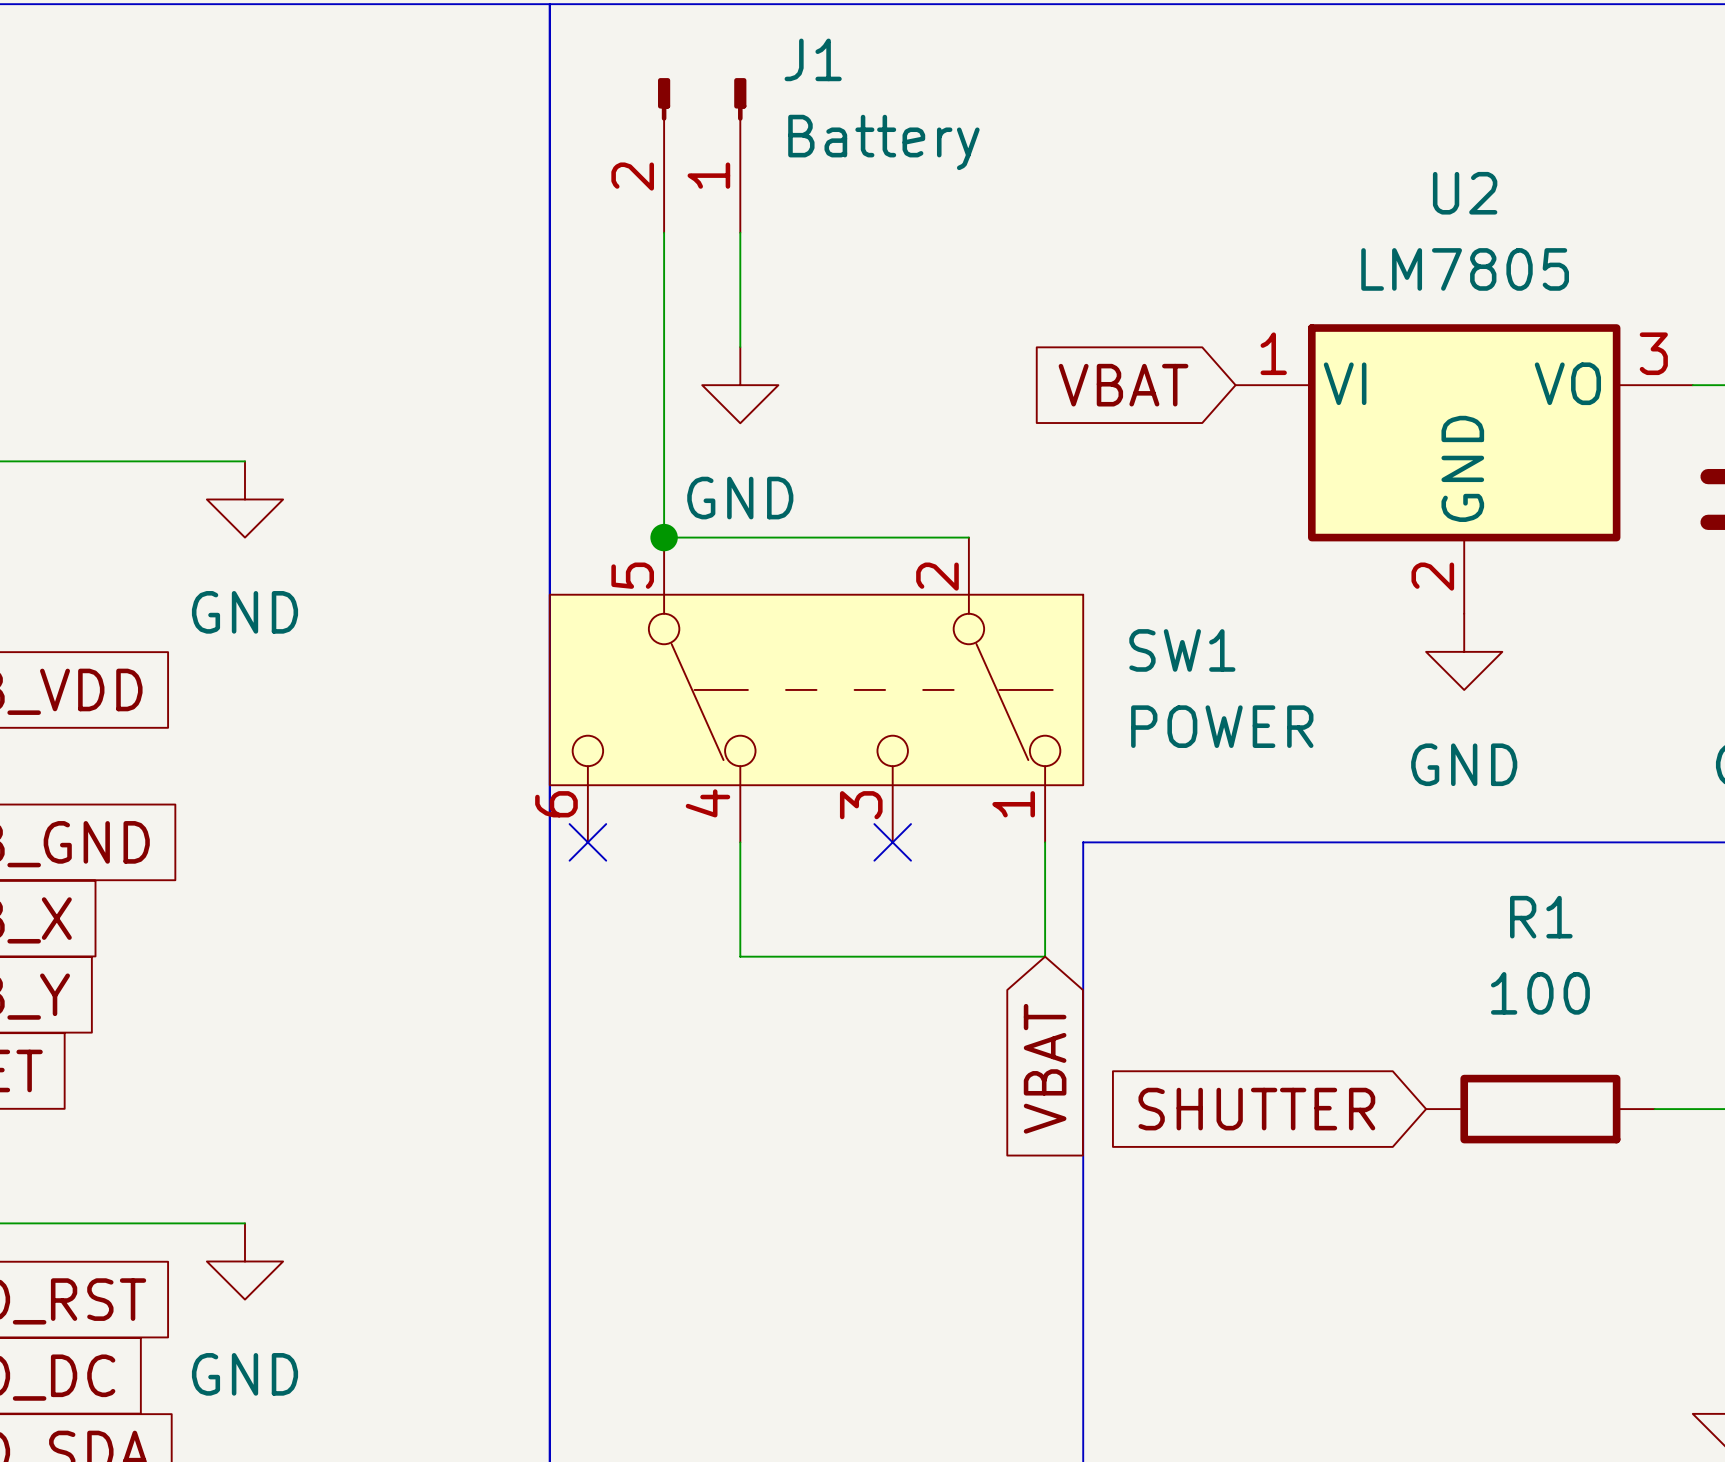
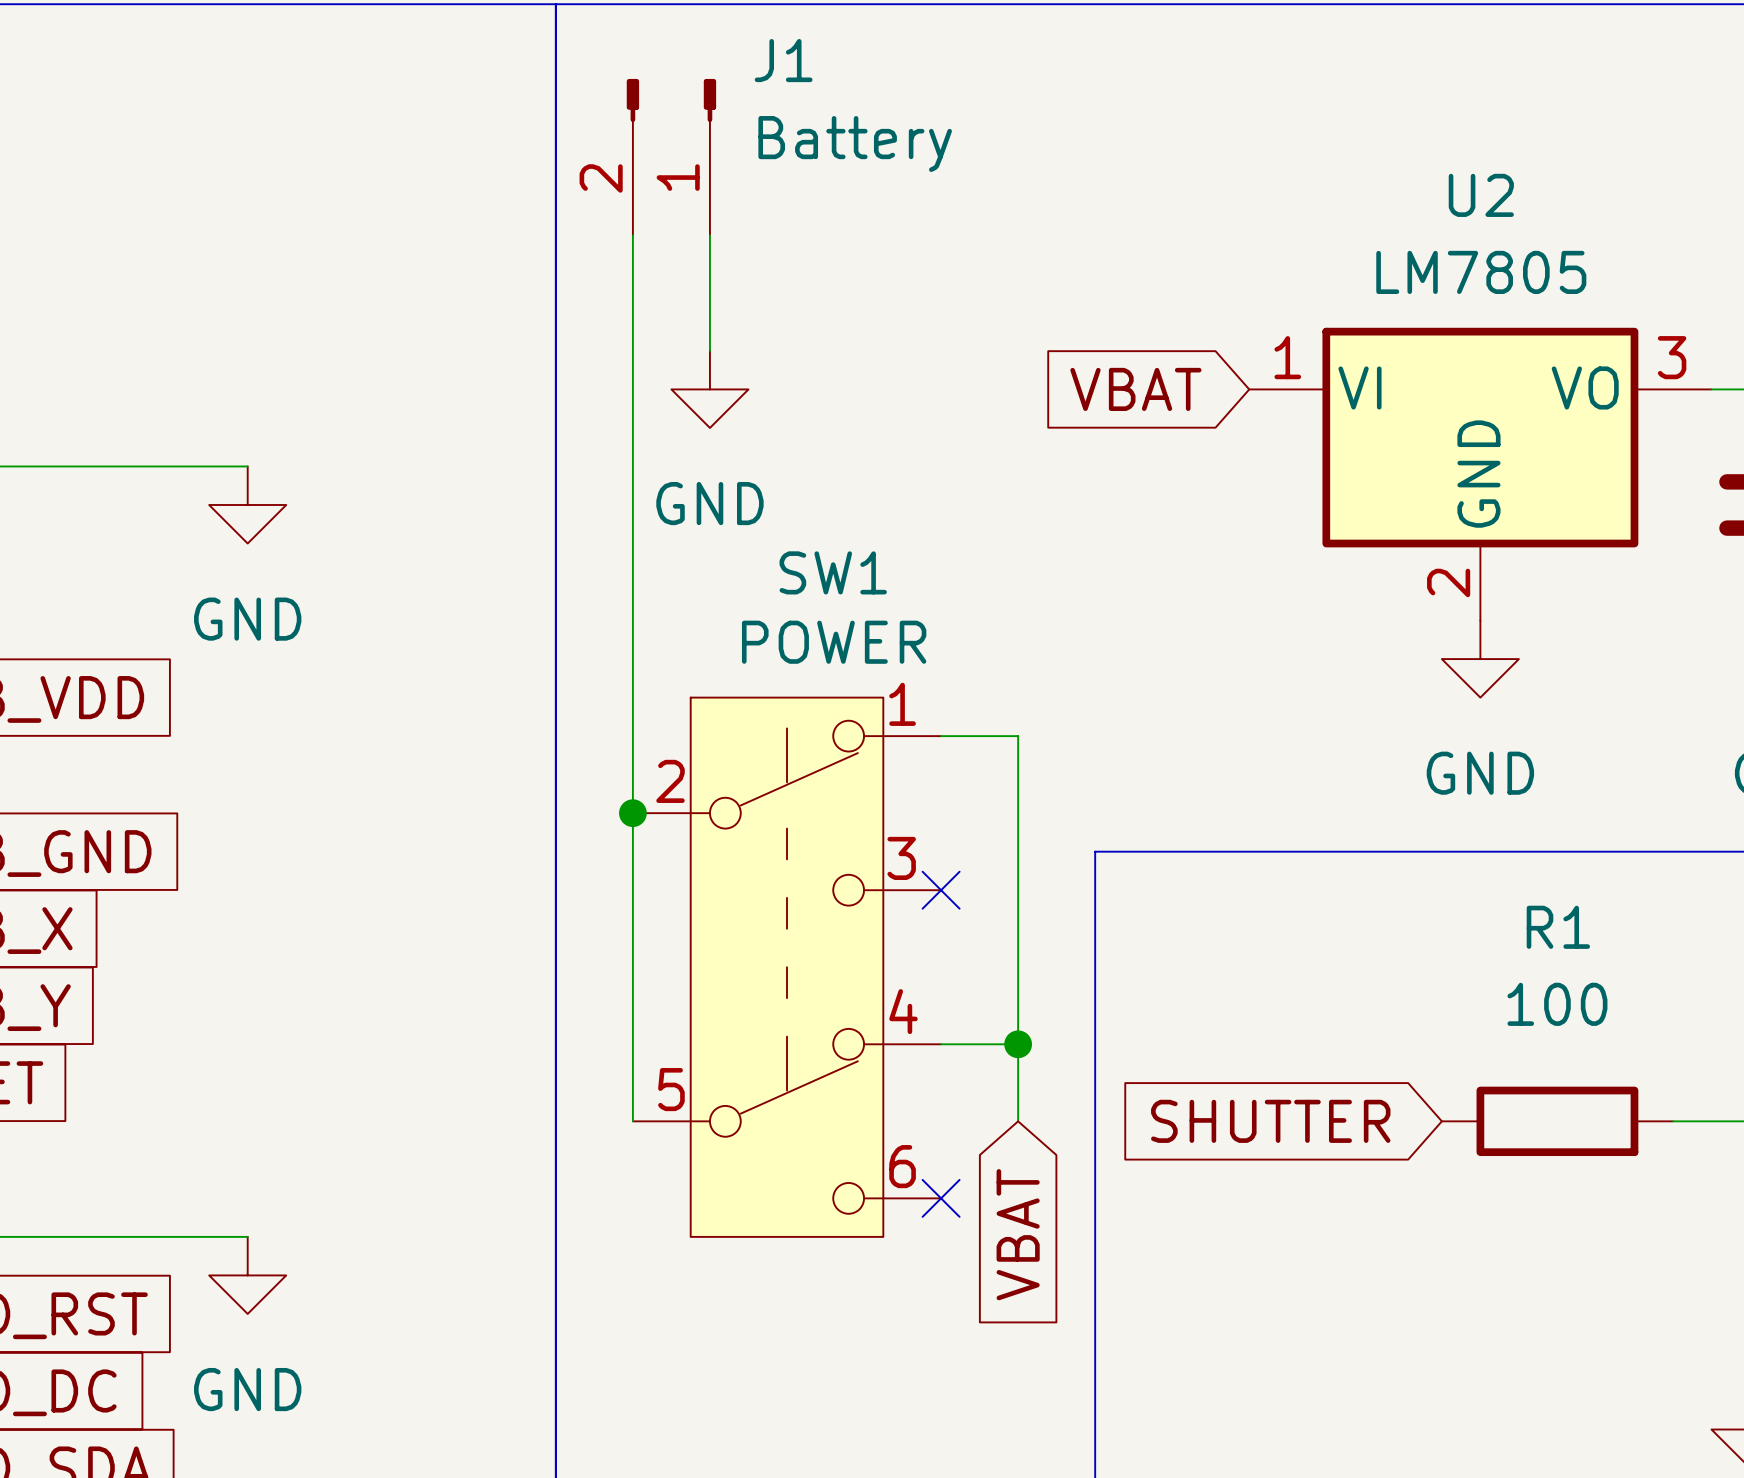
J1 position: (702, 155) -> (671, 157)
wire: none -> (632, 235) (632, 1121)
wire: (664, 232) (664, 537) (968, 537) -> none
wire: (740, 232) (740, 347) -> (709, 235) (709, 350)
power symbol position: GND (740, 385) -> GND (709, 389)
junction: (664, 537) -> none
SW1 name position: SW1 (1182, 650) -> SW1 (833, 572)
SW1 rotation: 0° (816, 689) -> 90° counterclockwise (787, 967)
SW1 value position: POWER (1222, 726) -> POWER (834, 642)
wire: none -> (941, 736) (1018, 736) (1018, 1121)
junction: none -> (632, 813)
no-connect mark: (587, 842) -> none
wire: (740, 842) (740, 956) (1045, 956) (1045, 842) -> none
no-connect mark position: (892, 842) -> (941, 890)
wire: none -> (941, 1044) (1018, 1044)
junction: none -> (1018, 1044)
global label position: VBAT (1045, 1068) -> VBAT (1018, 1234)
no-connect mark: none -> (941, 1198)

